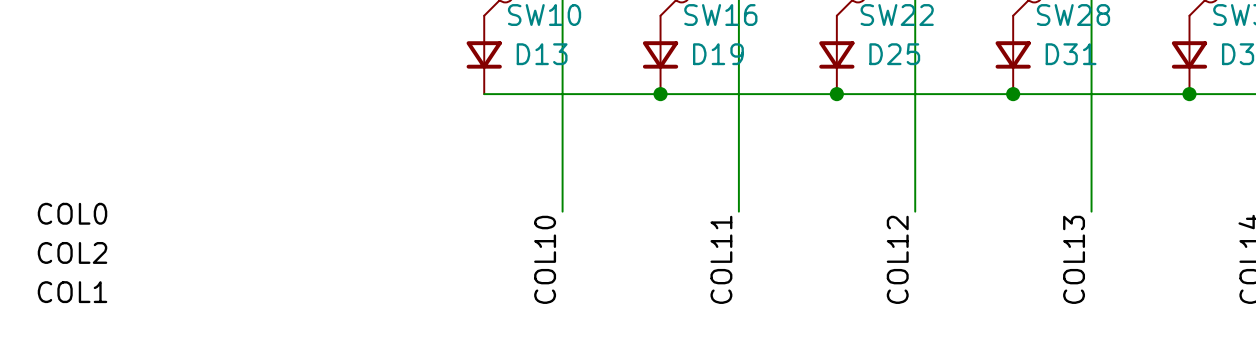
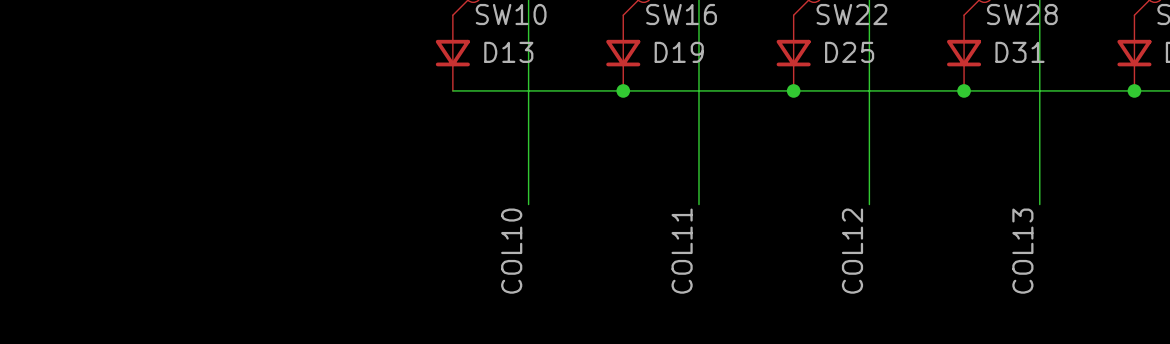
label: COL0 (72, 213) -> none
label: COL2 (72, 252) -> none
label: COL1 (72, 292) -> none

